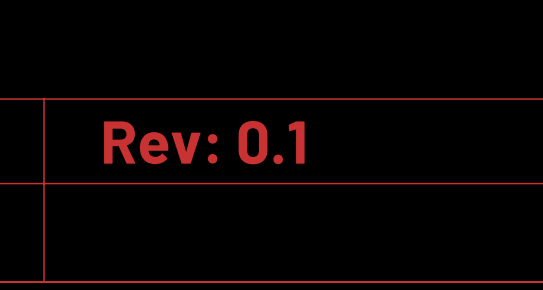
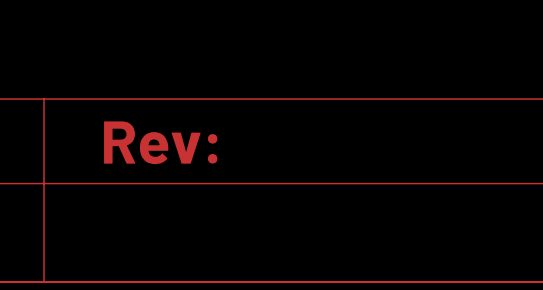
title block: Rev: 0.1 (204, 142) -> Rev: (160, 142)

